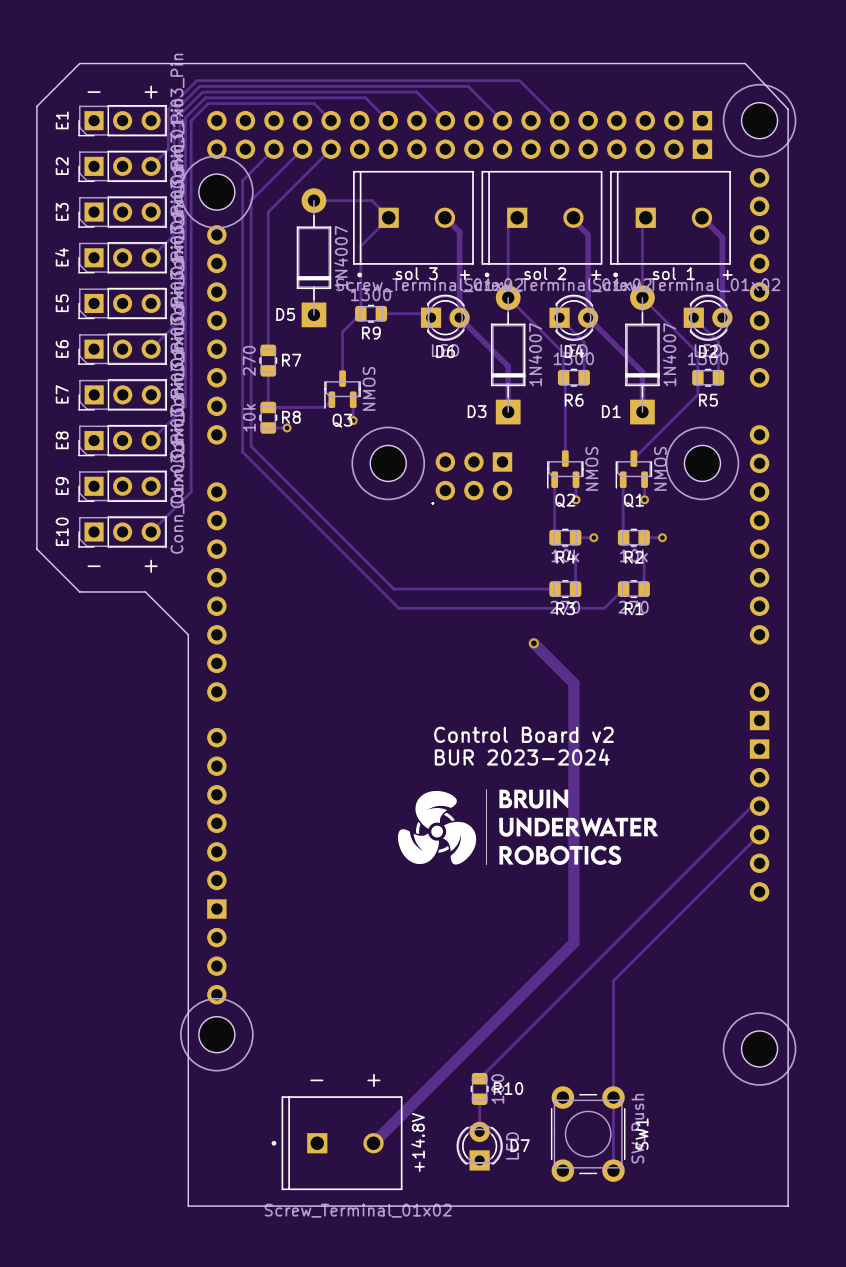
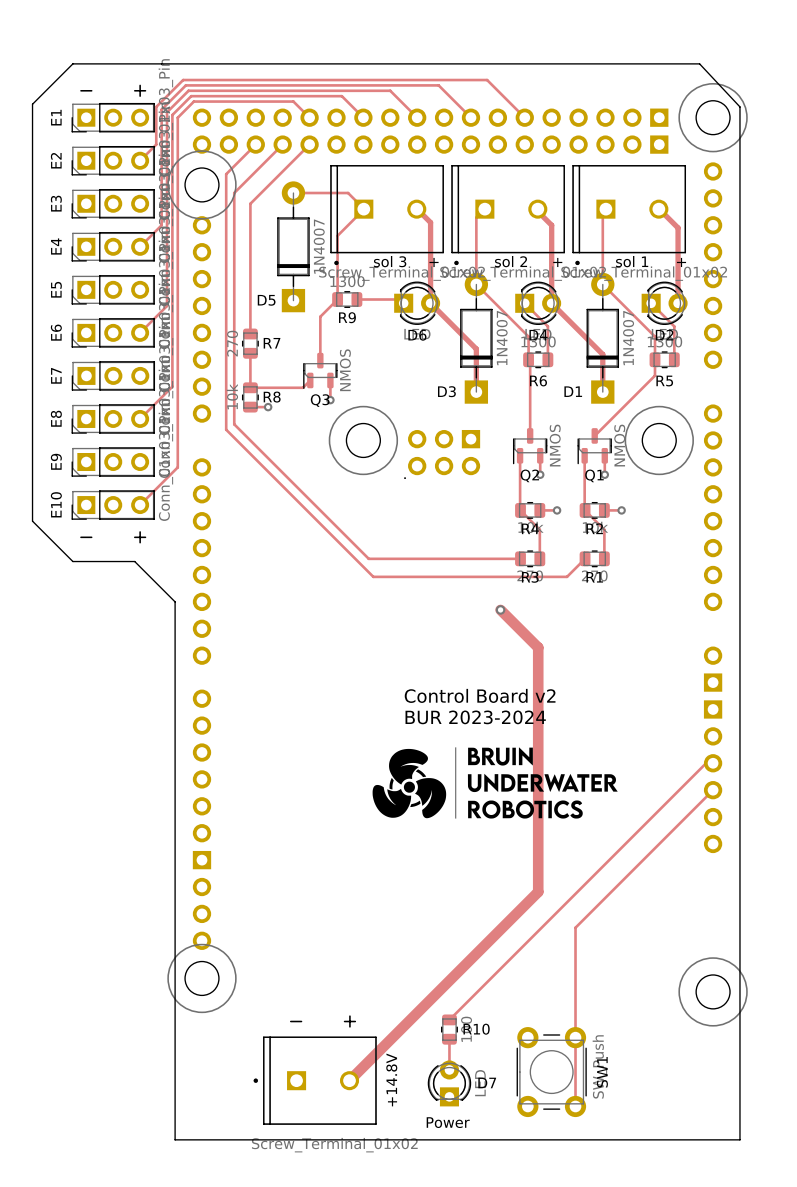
text: none -> Power (448, 1122)

